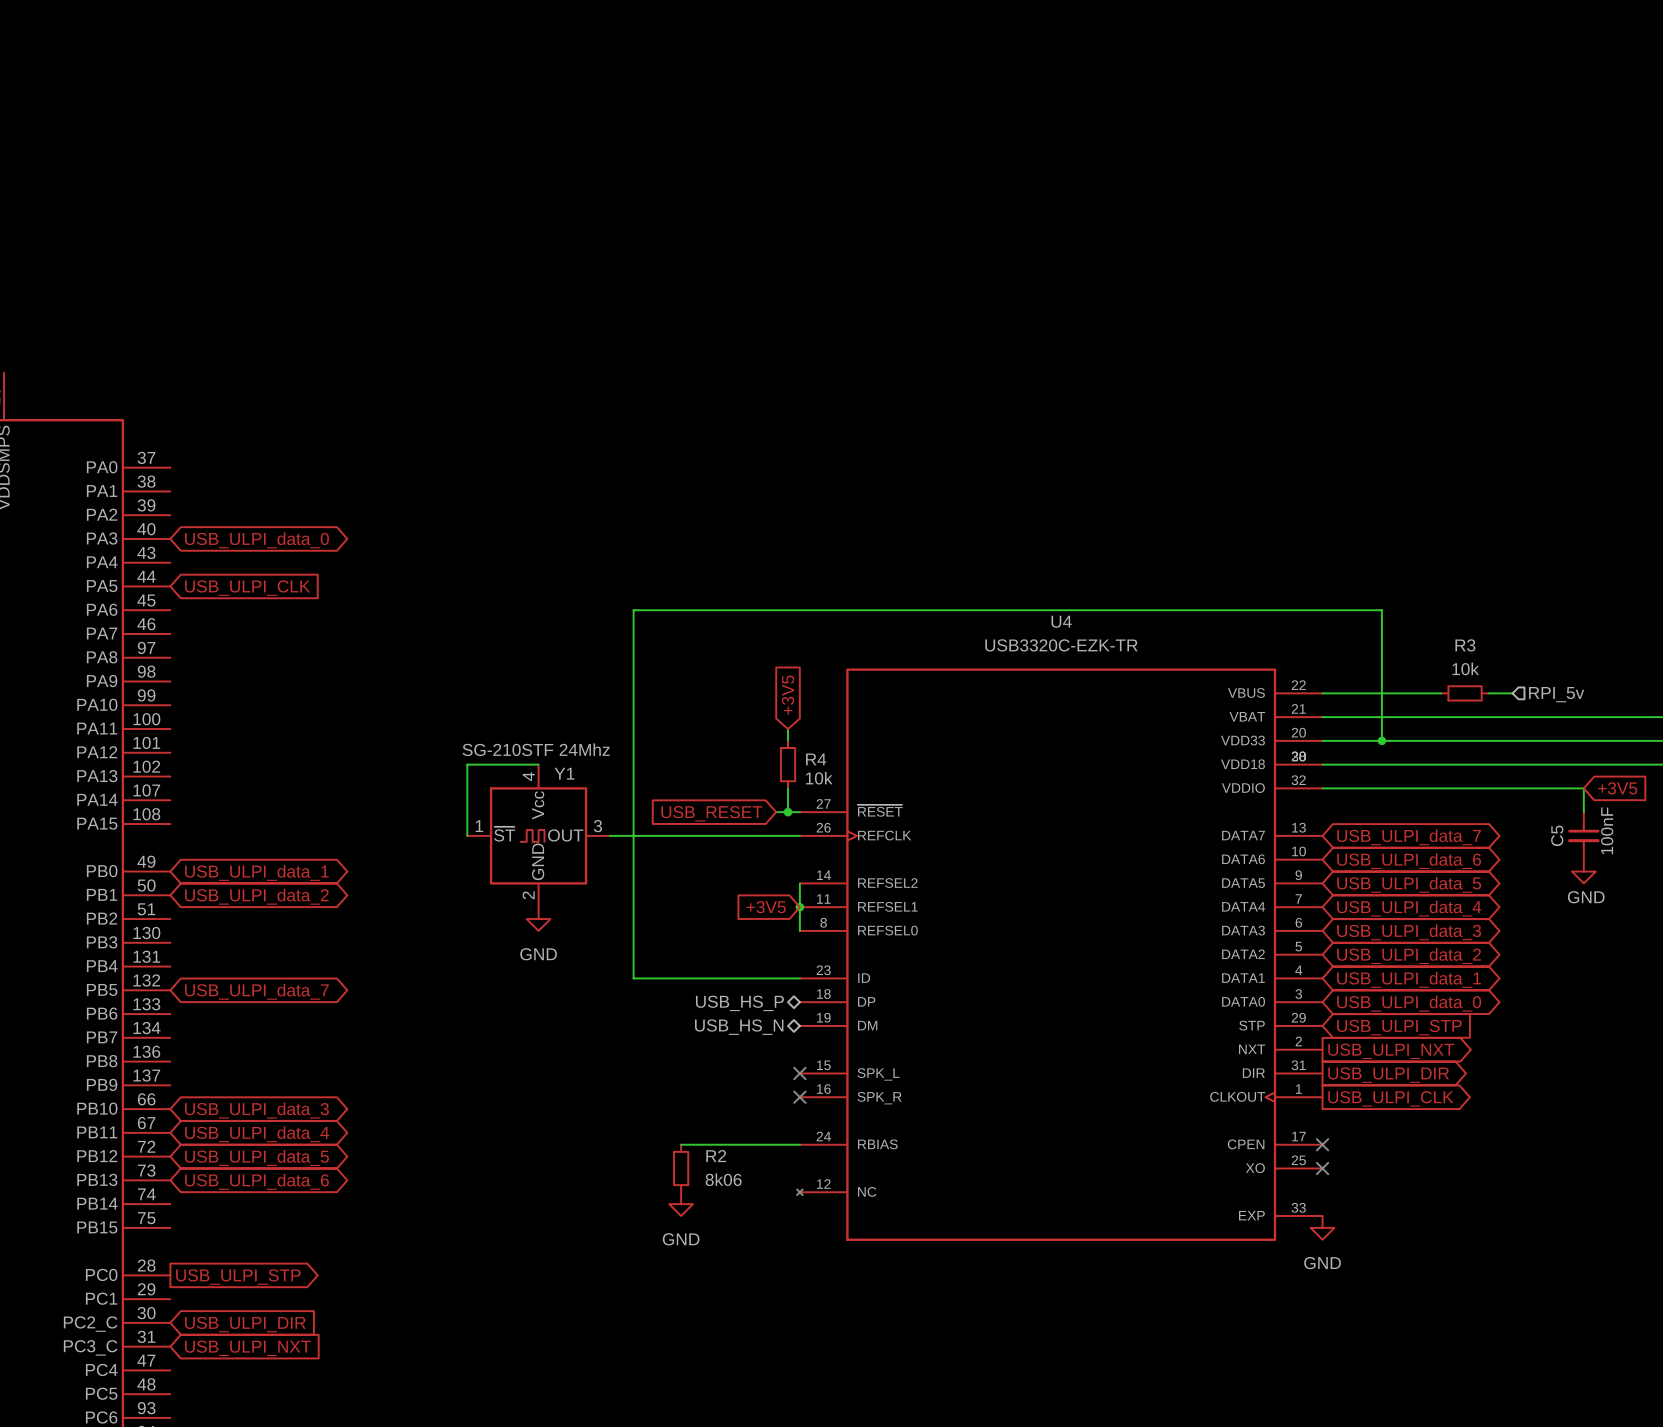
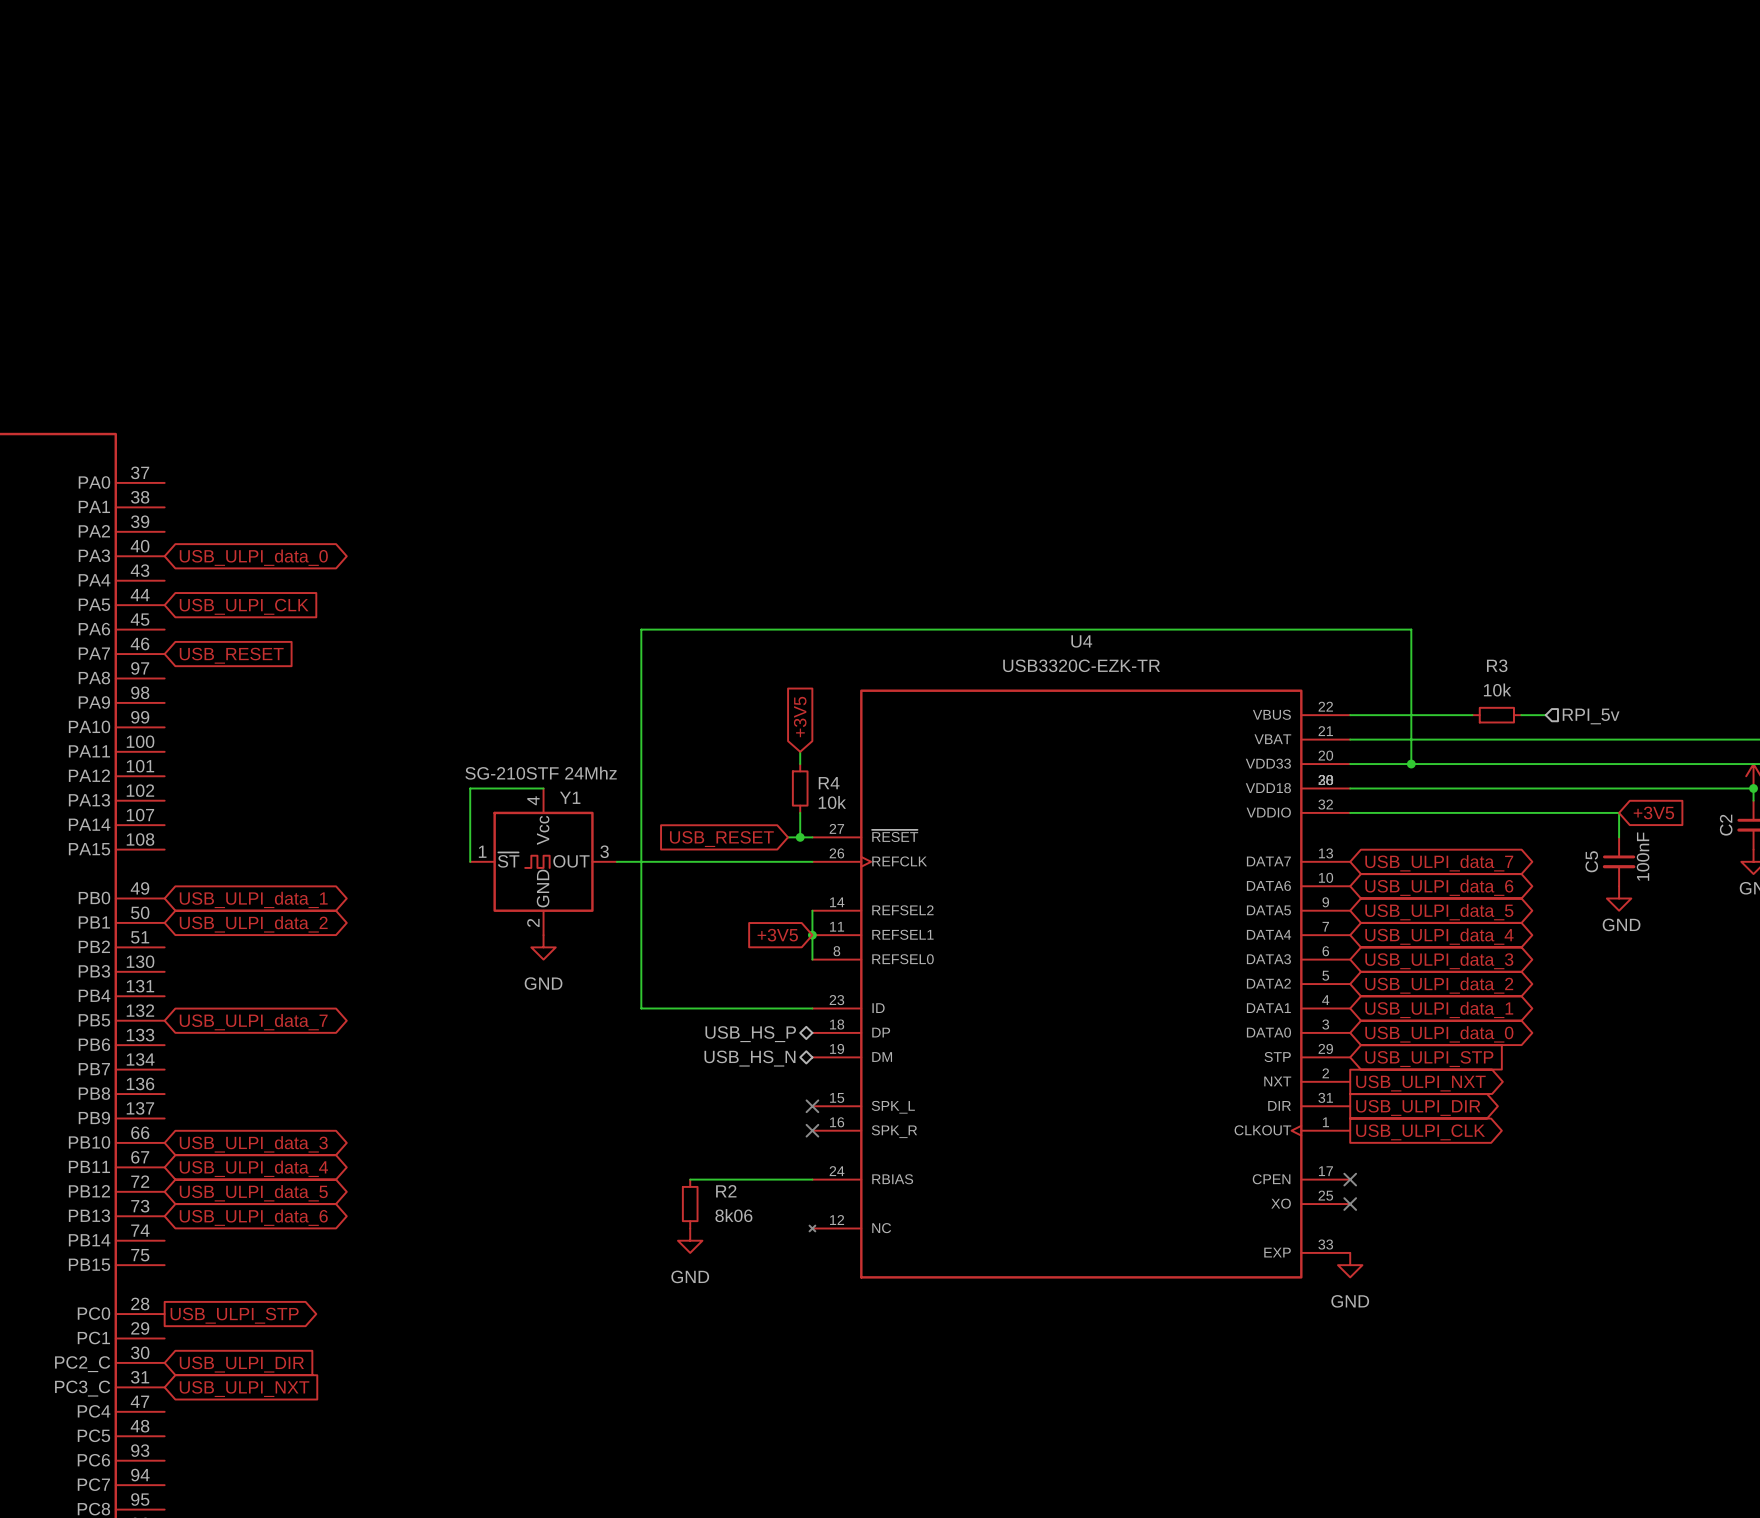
global label: none -> USB_RESET (231, 655)

